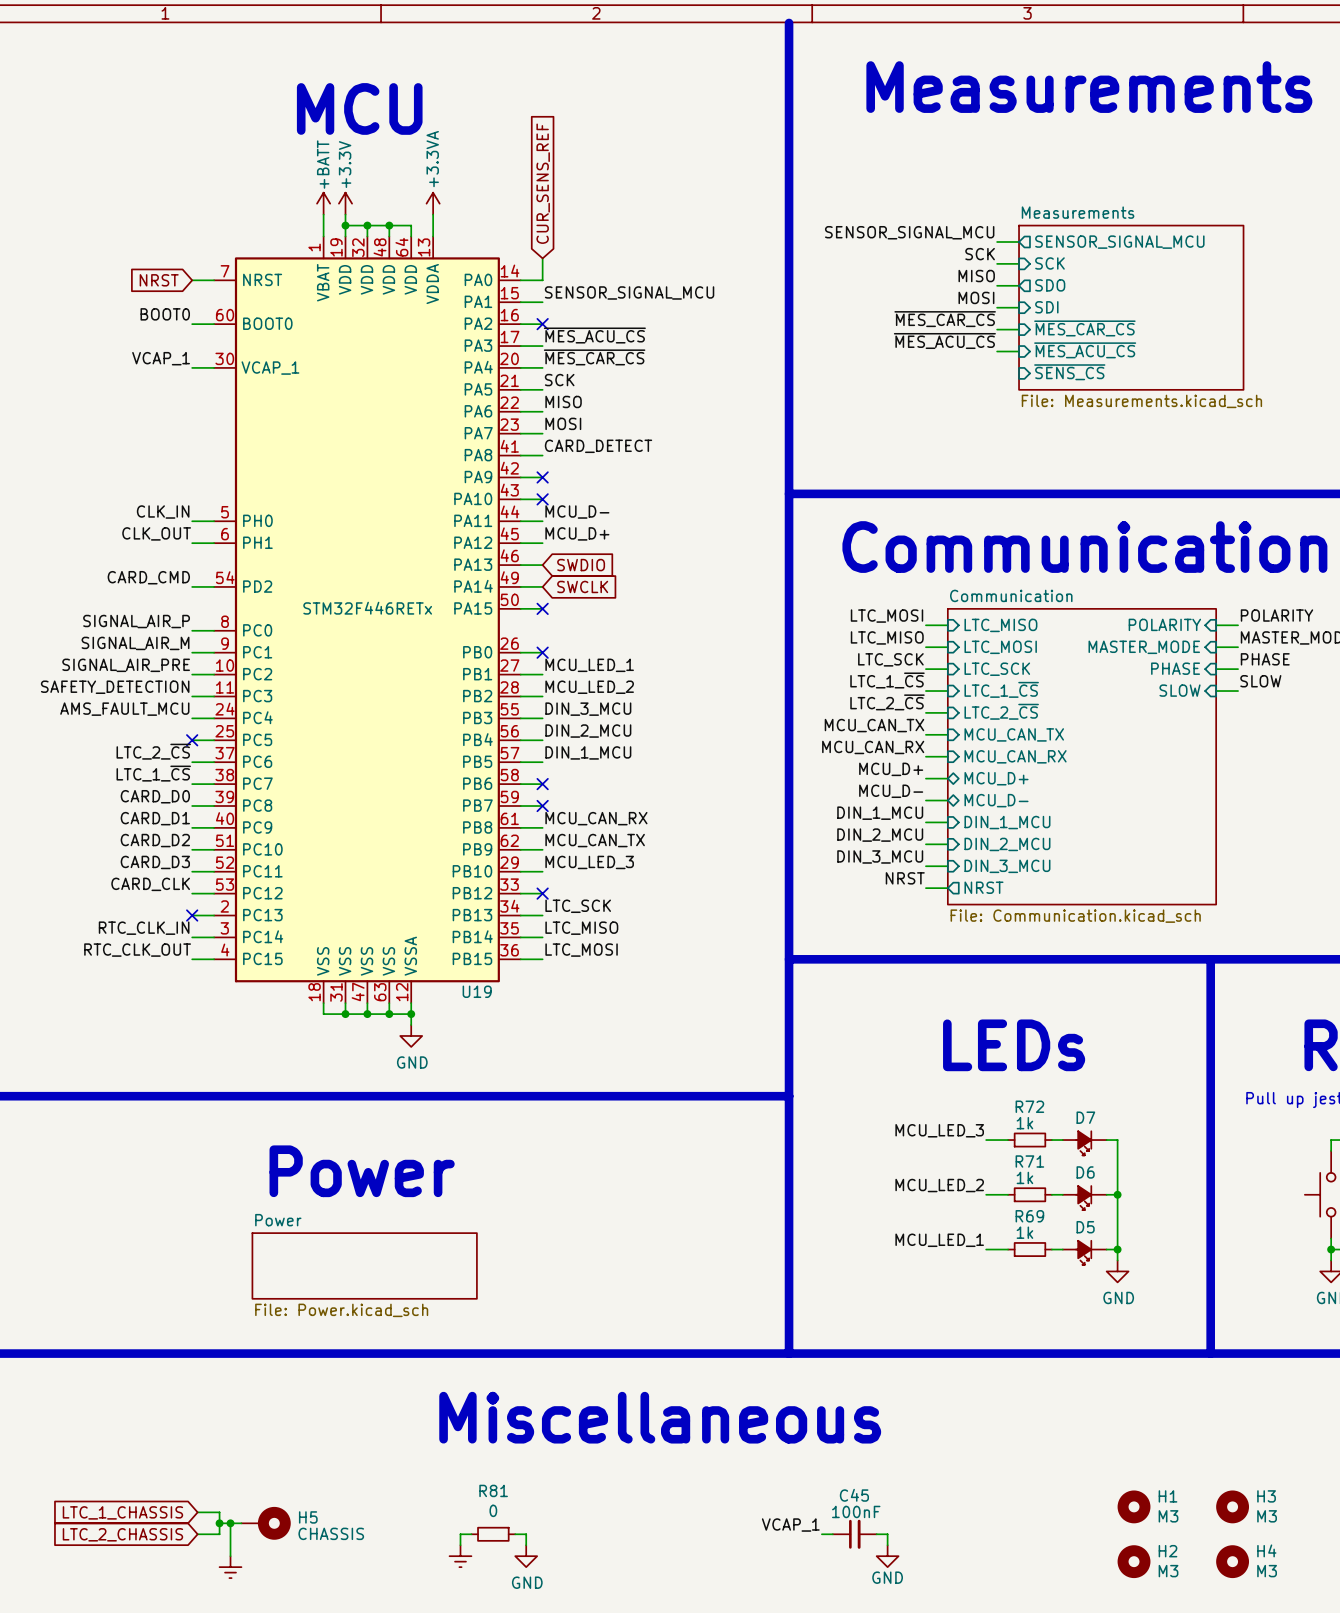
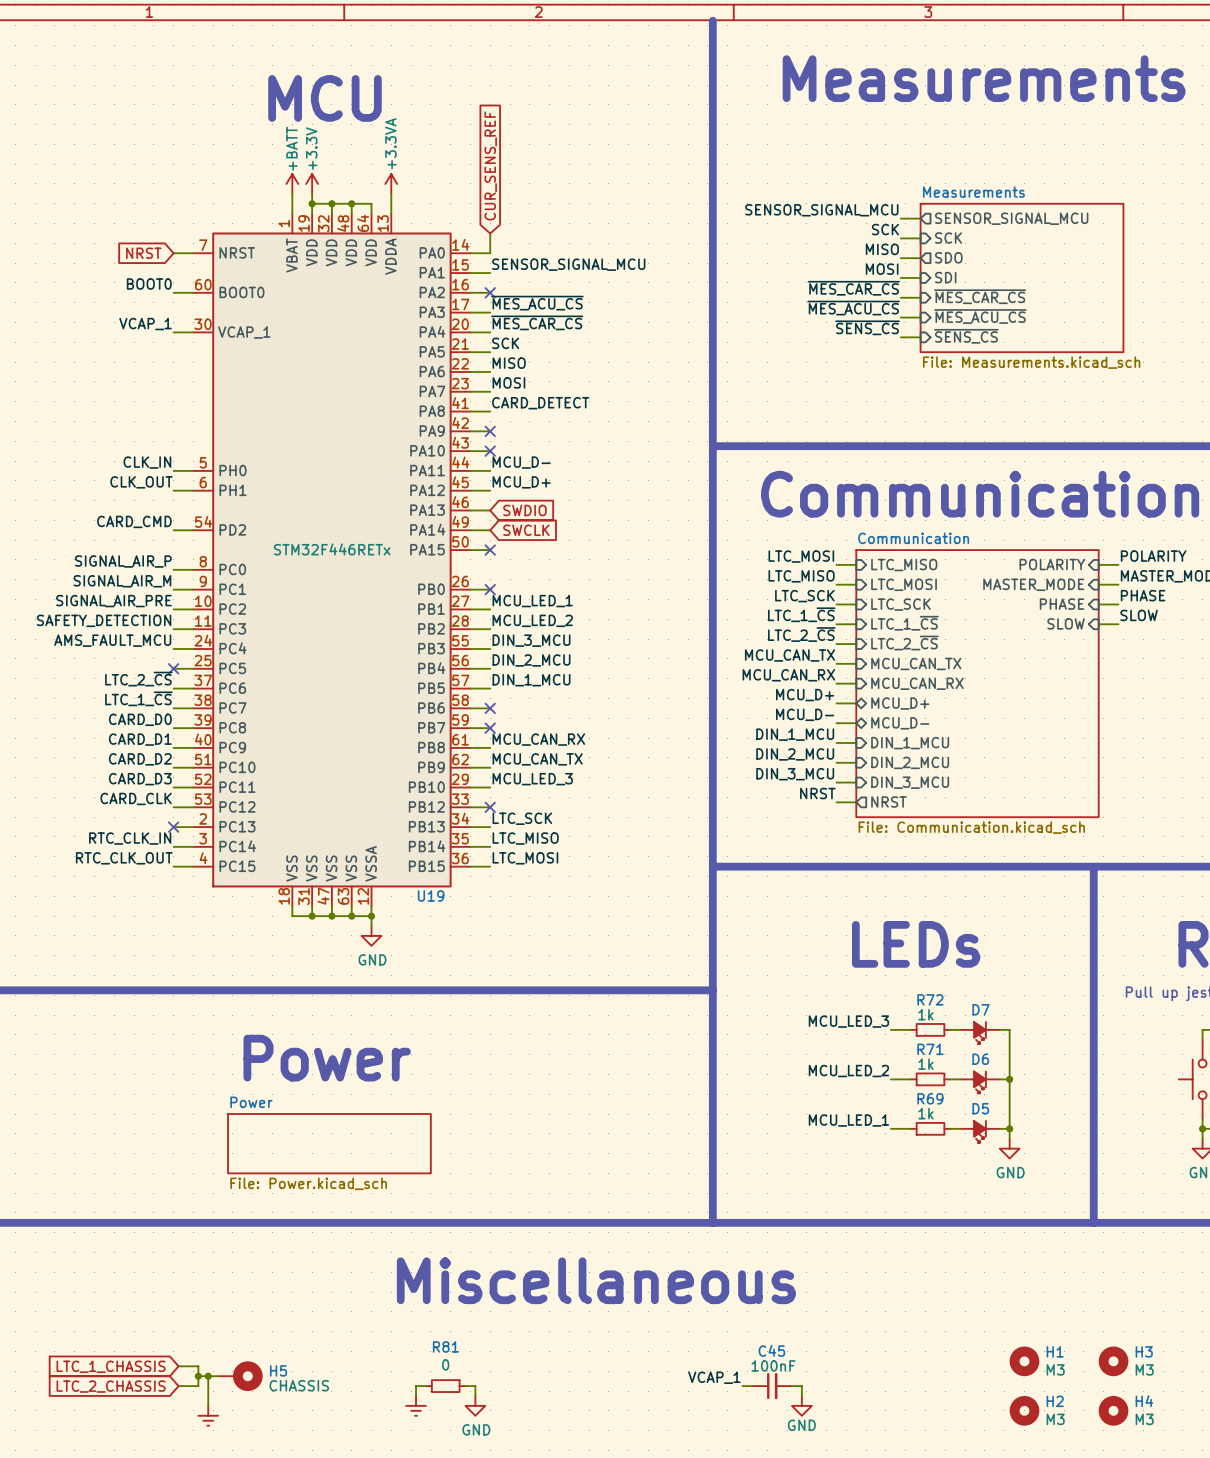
label: none -> ~{SENS_CS} (867, 327)
wire: none -> (900, 337) (920, 337)

